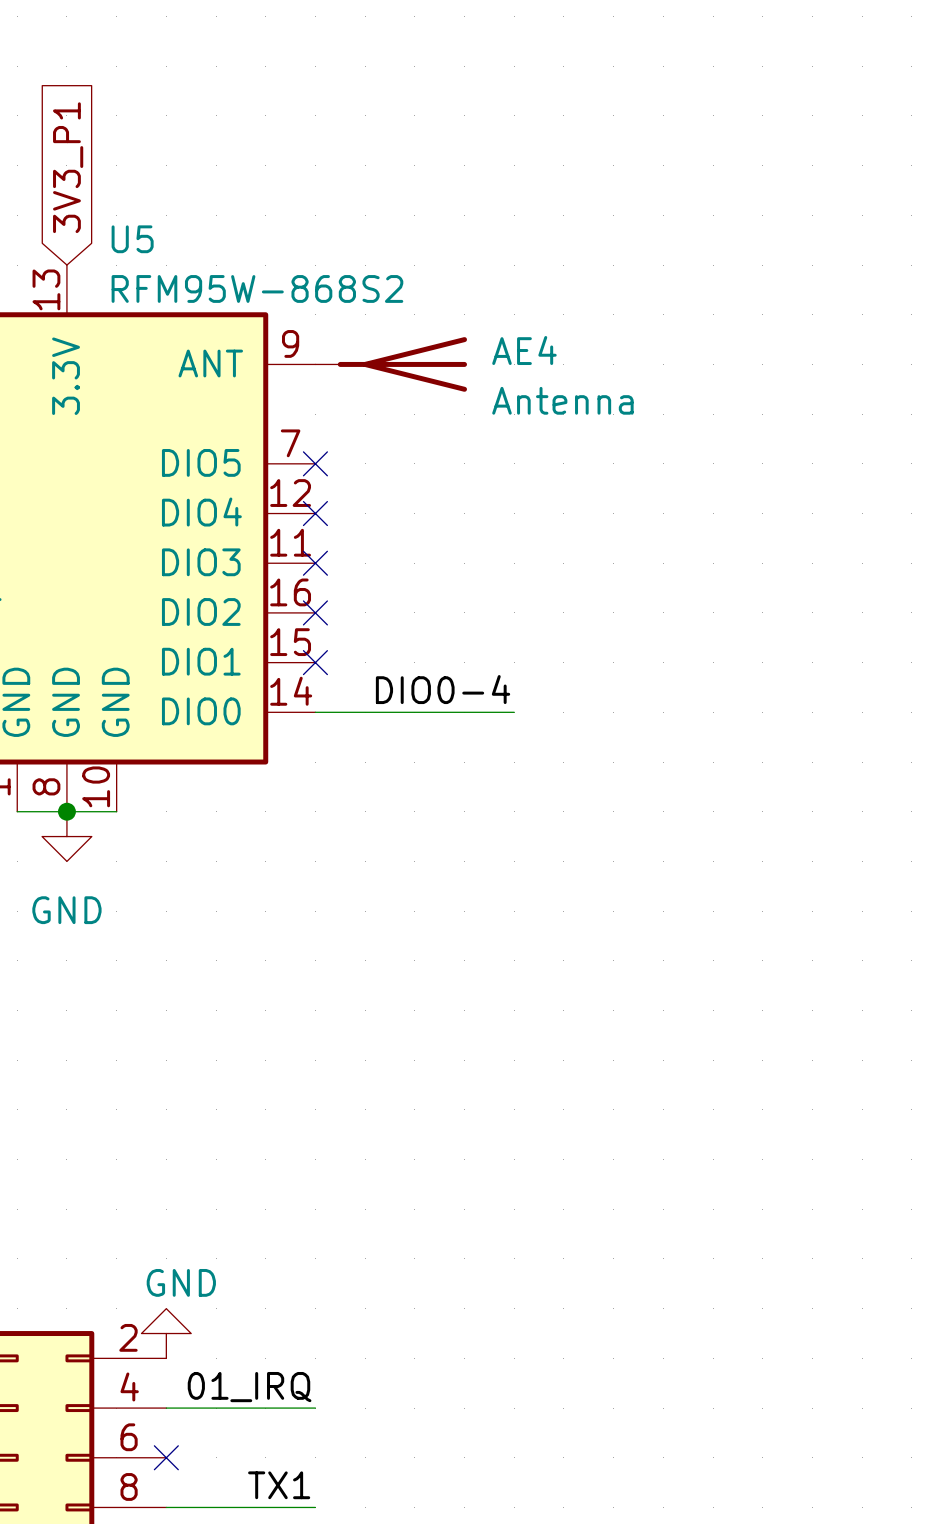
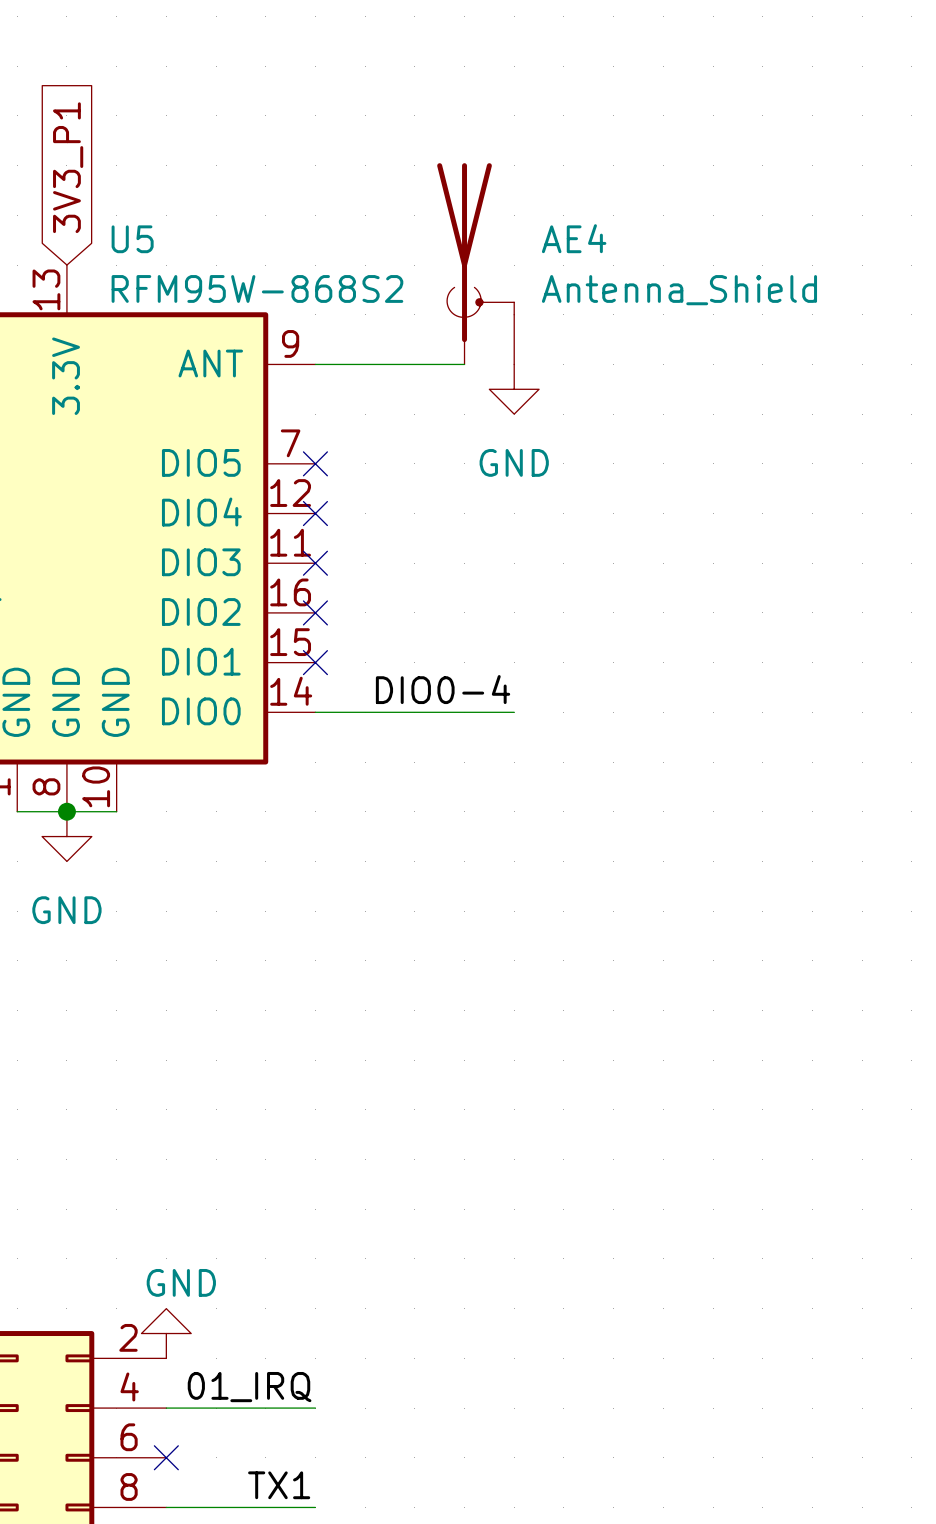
AE4 symbol: [315, 337, 468, 392] -> [437, 163, 515, 365]
power symbol: none -> GND (514, 389)
AE4 value: Antenna (562, 400) -> Antenna_Shield (679, 290)

